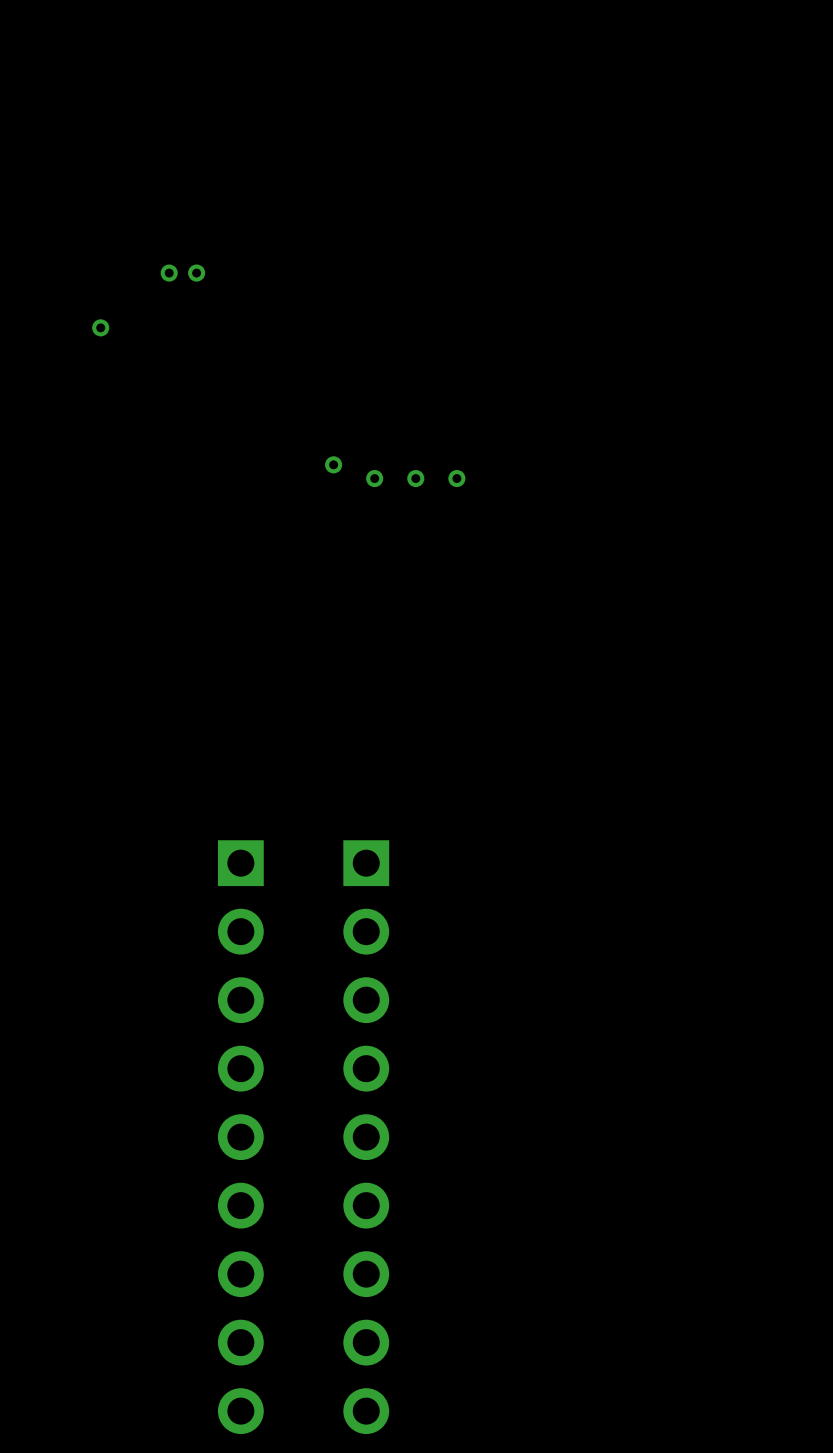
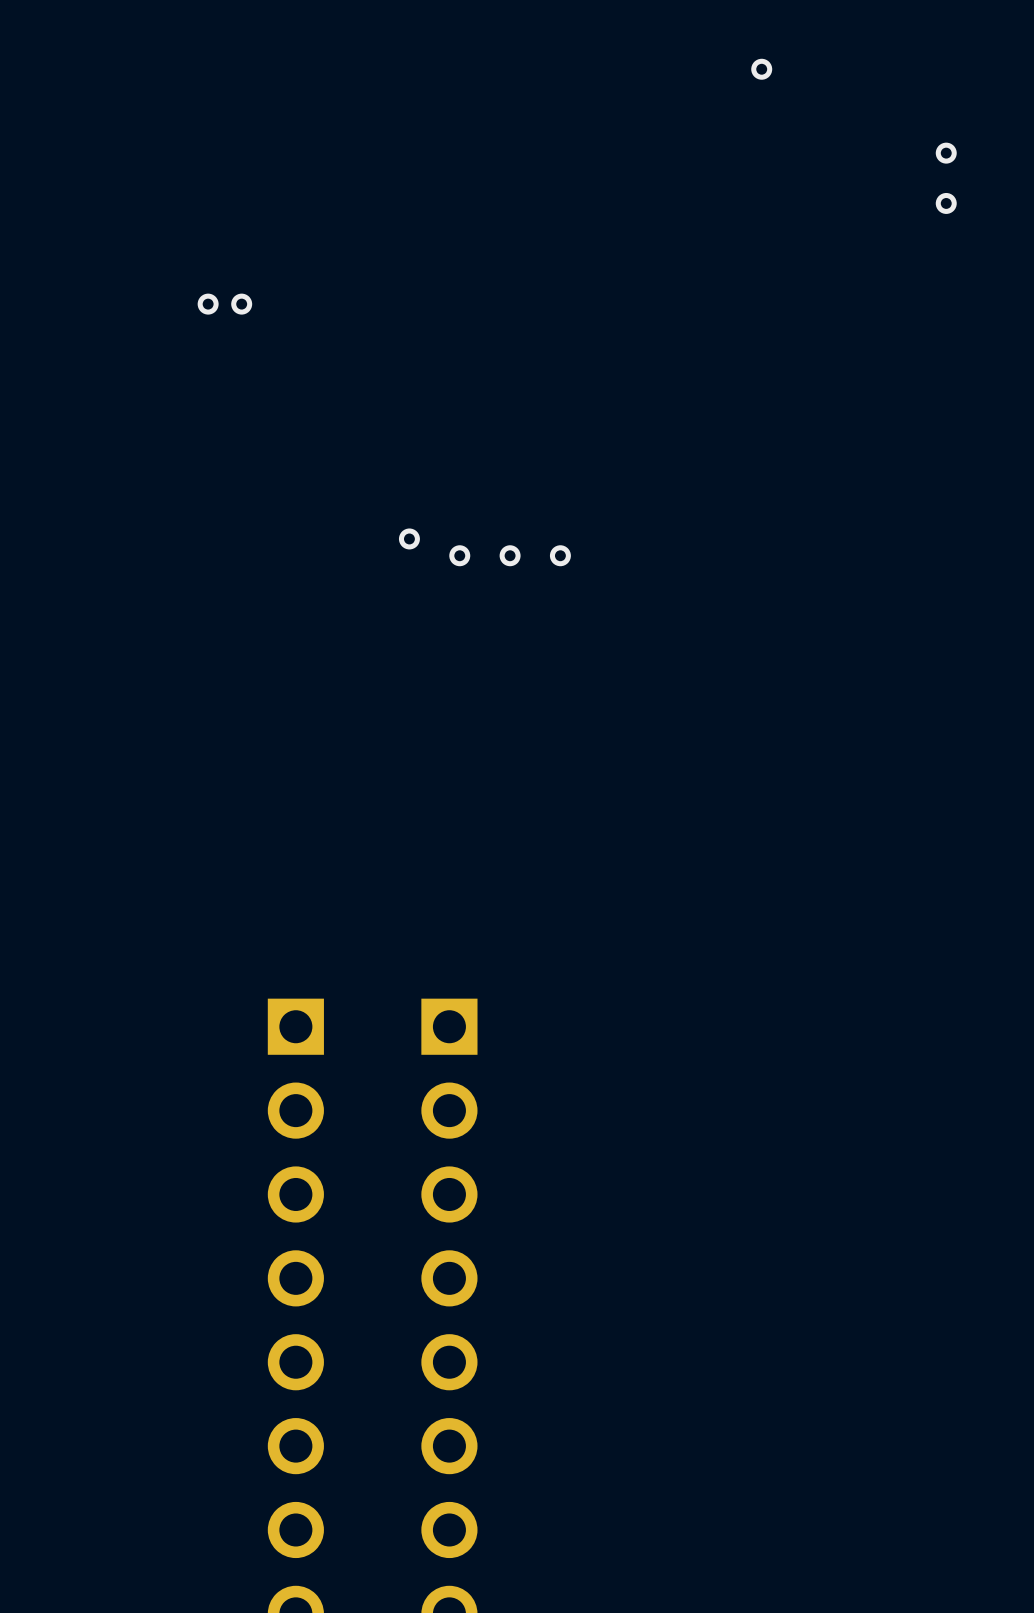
via: none -> (761, 69)
via: none -> (946, 153)
via: none -> (946, 203)
via: (100, 327) -> none

